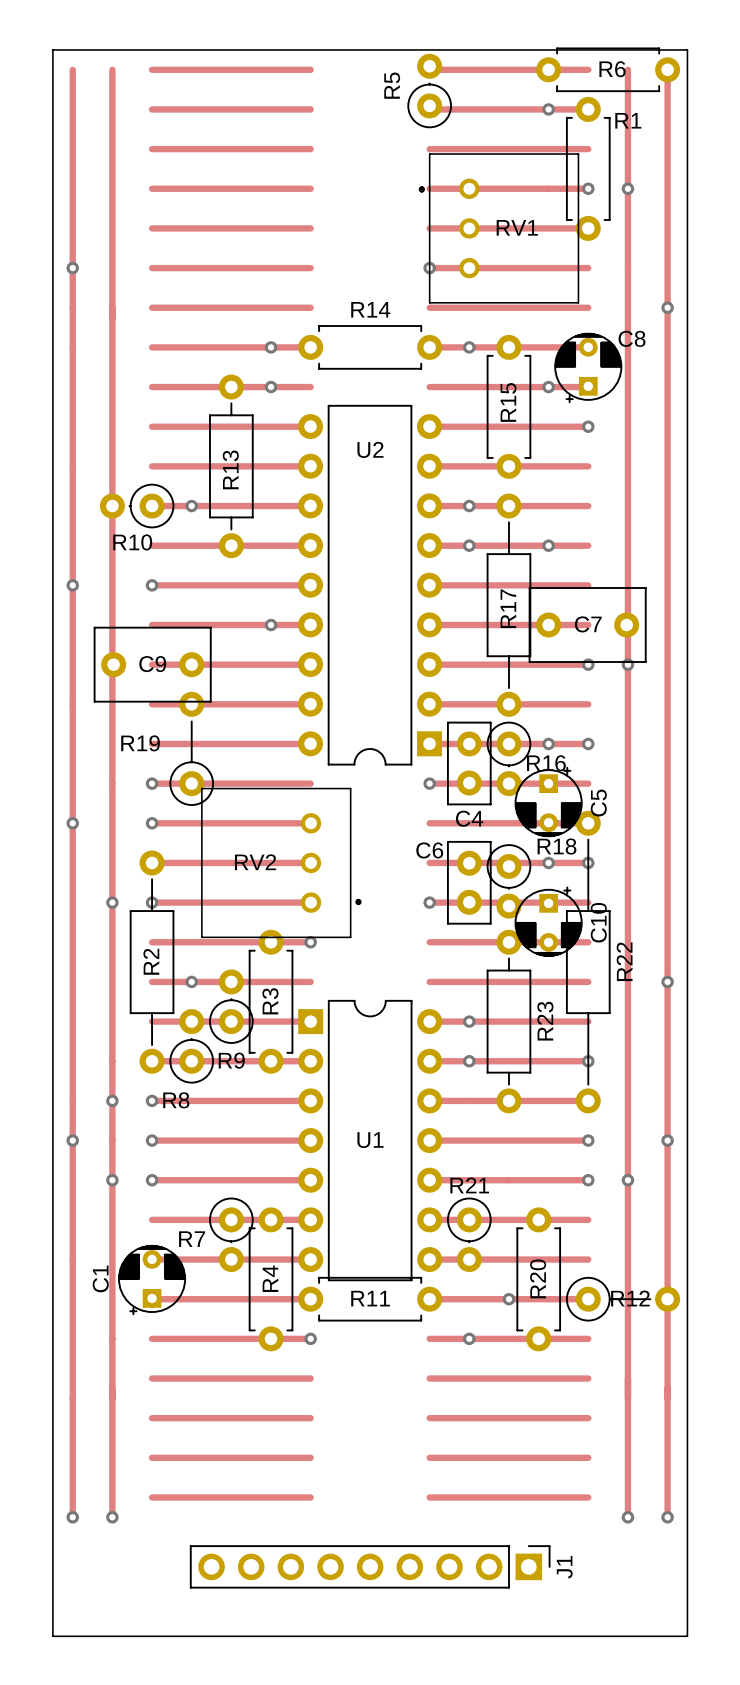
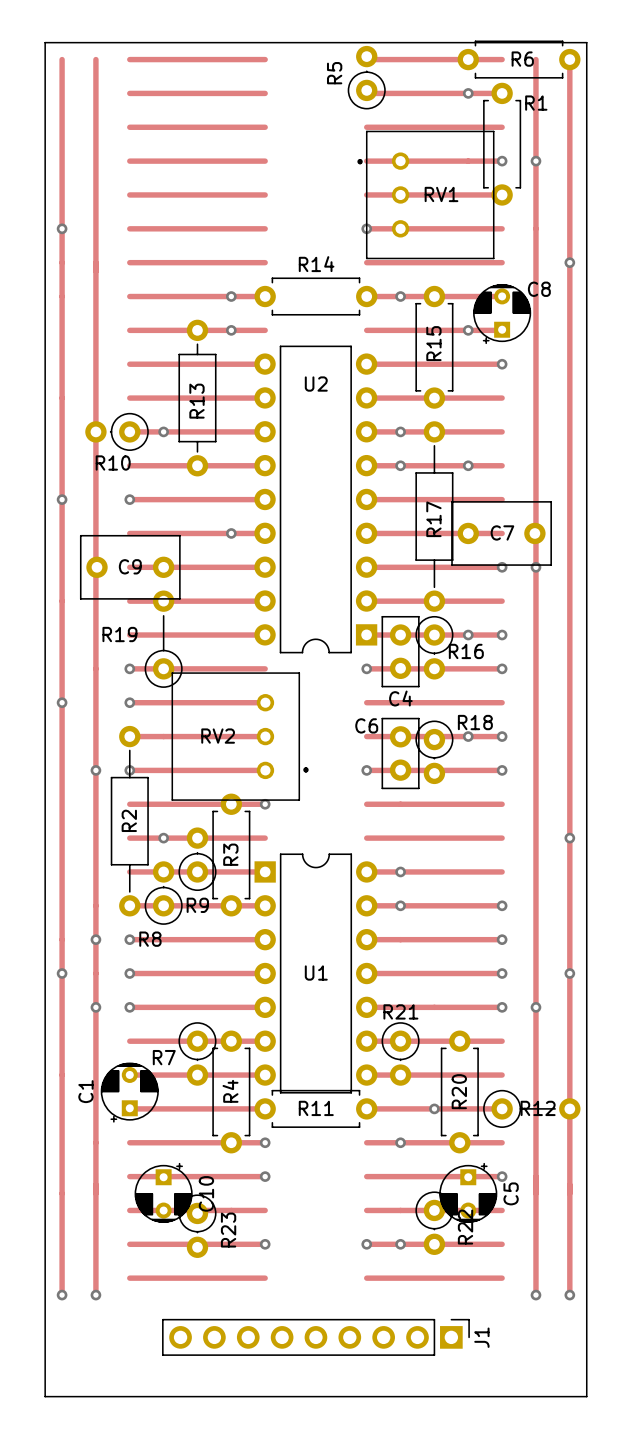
via: none -> (502, 668)
C5 position: (548, 801) -> (468, 1192)
R22 footprint: [565, 810, 611, 1114] -> [415, 1191, 454, 1255]
via: none -> (502, 770)
C10 position: (548, 921) -> (163, 1192)
R23 footprint: [486, 929, 532, 1114] -> [178, 1194, 217, 1258]
via: none -> (502, 939)
via: none -> (265, 1176)
via: none -> (502, 1176)
via: none -> (265, 1244)
via: none -> (366, 1244)
via: none -> (400, 1244)

